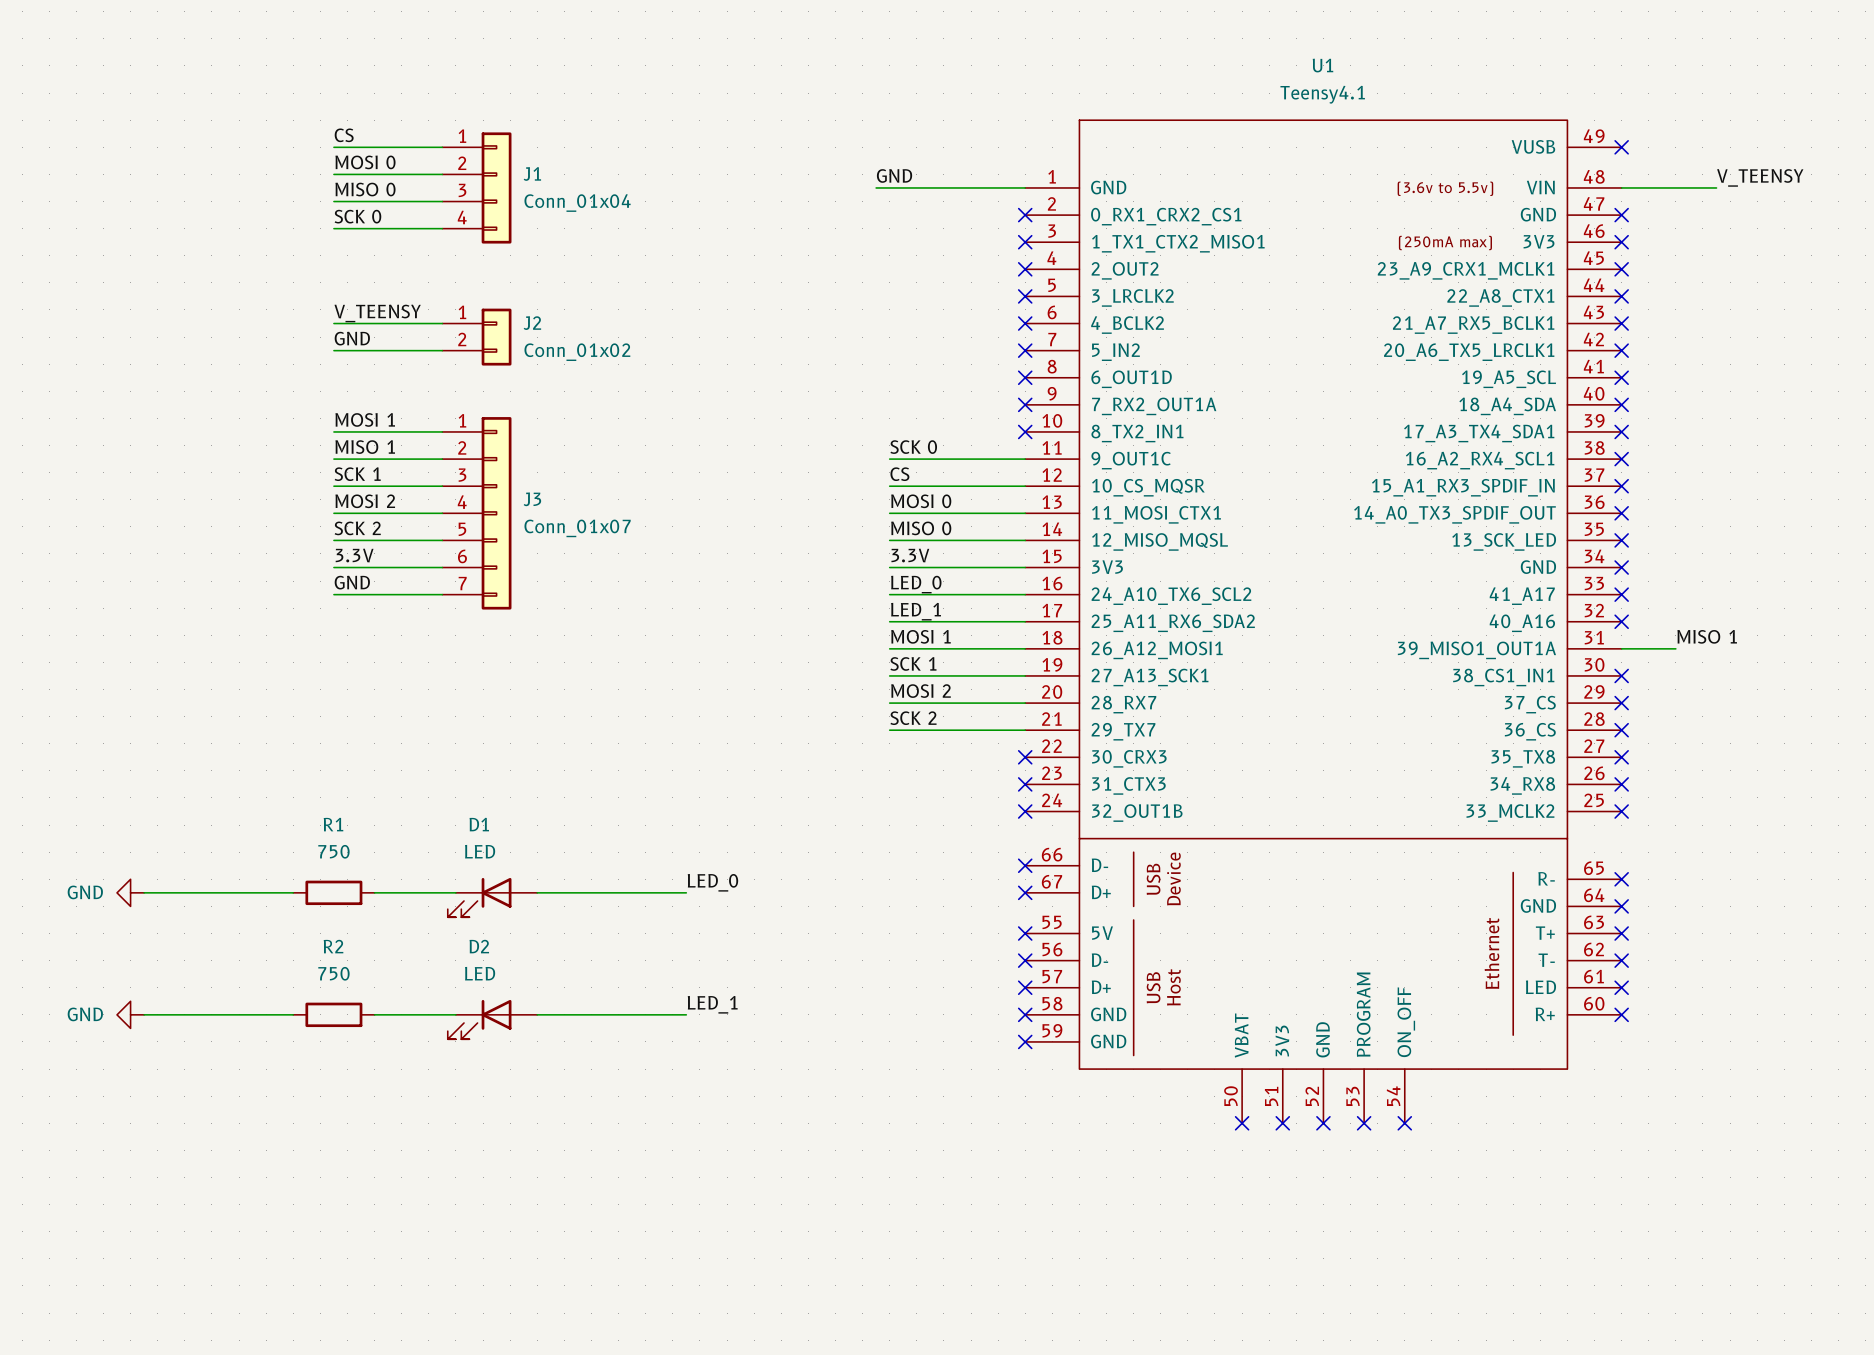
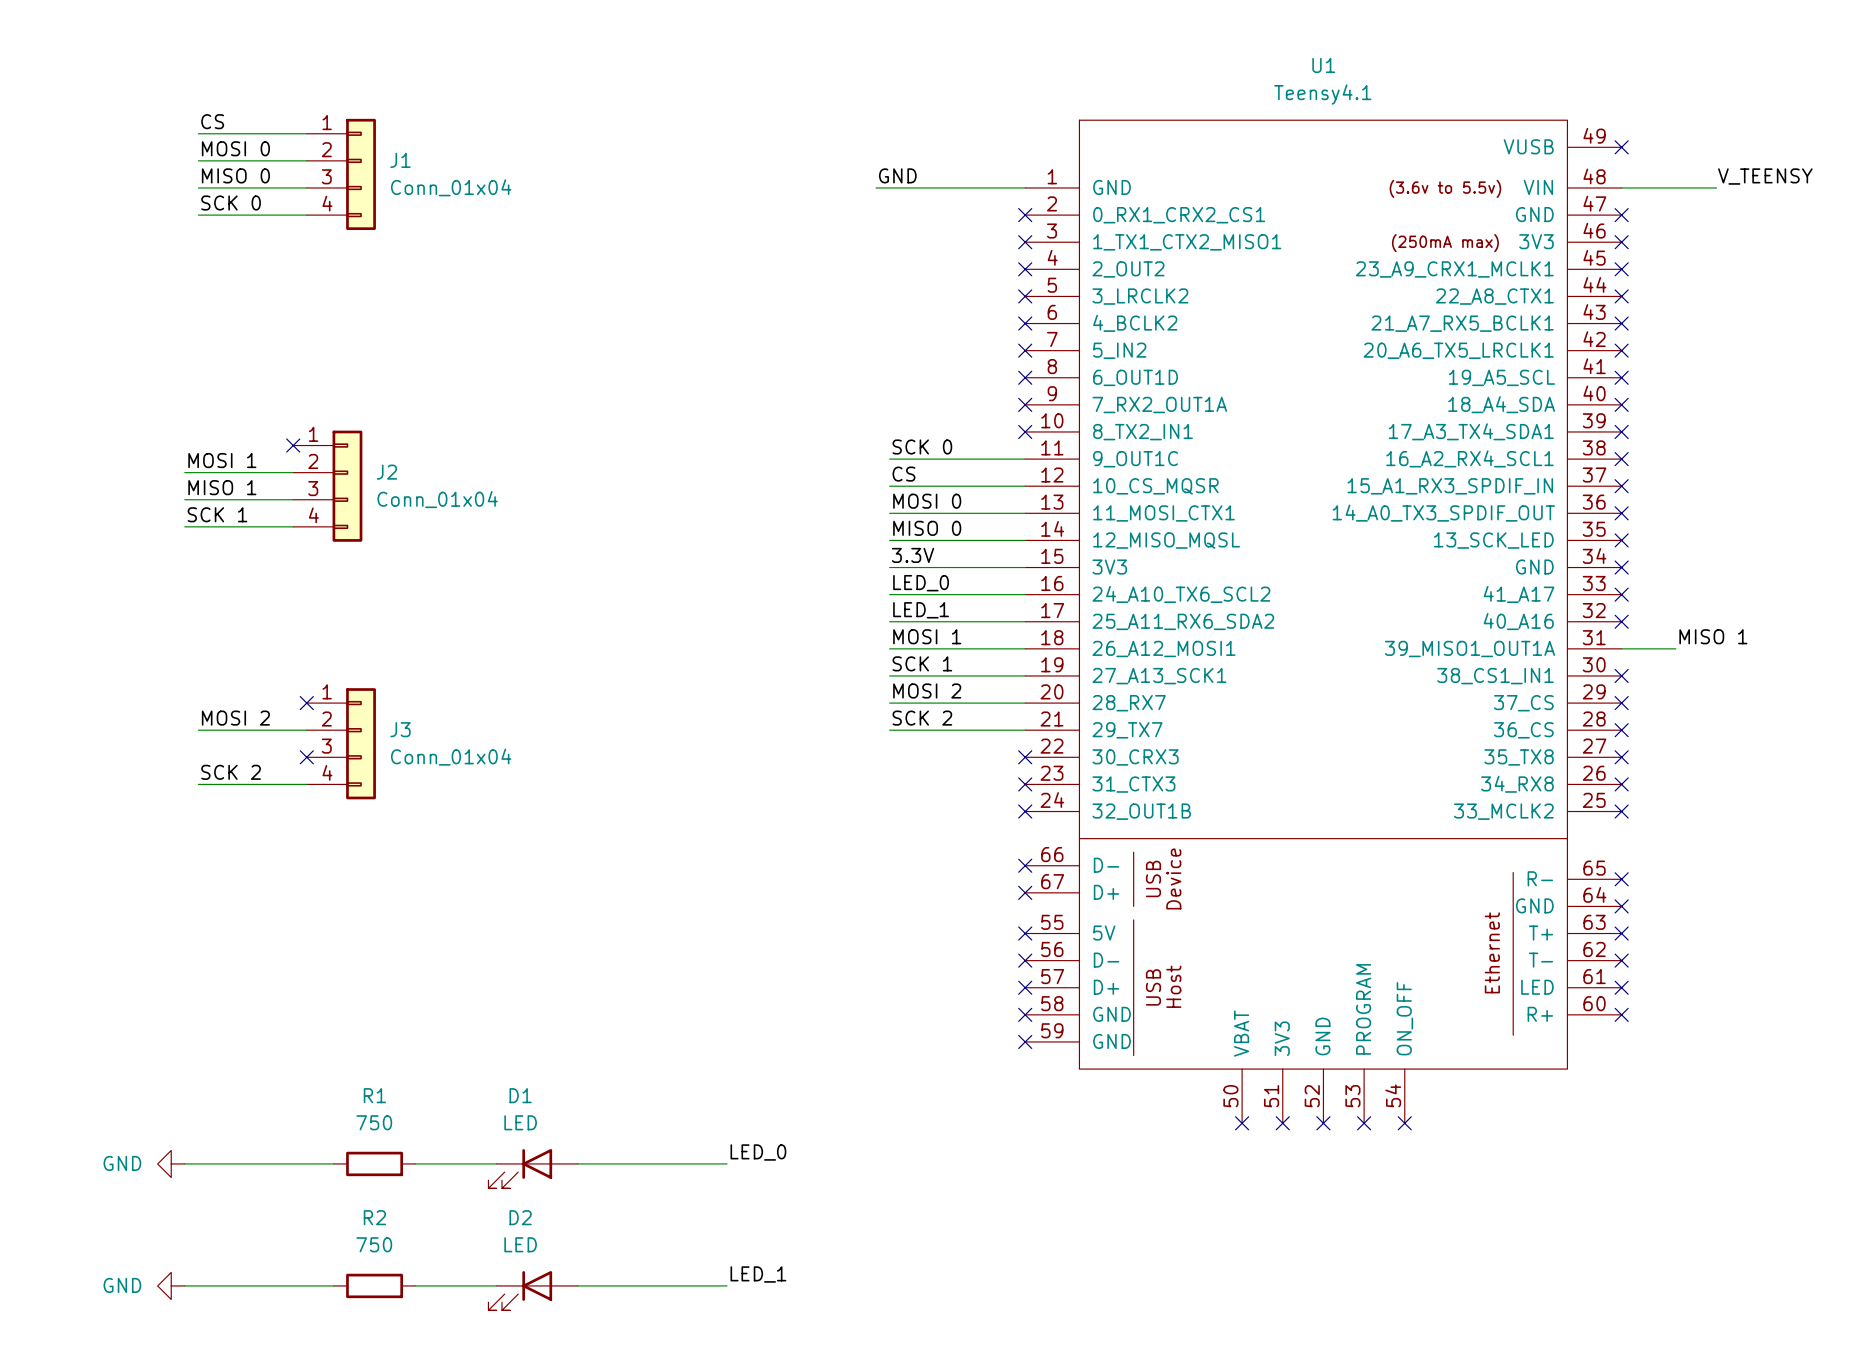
label position: CS (344, 135) -> CS (212, 121)
wire: (333, 147) (442, 147) -> (198, 133) (306, 133)
label position: MOSI 0 (365, 162) -> MOSI 0 (235, 148)
wire: (333, 174) (442, 174) -> (198, 160) (306, 160)
J1 position: (476, 187) -> (341, 174)
label position: MISO 0 (365, 189) -> MISO 0 (235, 175)
wire: (333, 201) (442, 201) -> (198, 187) (306, 187)
label position: SCK 0 (357, 216) -> SCK 0 (231, 203)
wire: (333, 228) (442, 228) -> (198, 215) (306, 215)
J2 symbol: [442, 308, 512, 366] -> [293, 430, 363, 542]
label: V_TEENSY (377, 313) -> none
wire: (333, 323) (442, 323) -> none
label: GND (352, 338) -> none
wire: (333, 350) (442, 350) -> none
J2 value: Conn_01x02 (577, 352) -> Conn_01x04 (437, 499)
J3 symbol: [442, 417, 512, 610] -> [306, 688, 376, 800]
label position: MOSI 1 (365, 419) -> MOSI 1 (222, 460)
wire: (333, 431) (442, 431) -> none
no-connect mark: none -> (293, 445)
label position: MISO 1 (365, 447) -> MISO 1 (222, 487)
wire: (333, 459) (442, 459) -> (184, 472) (293, 472)
label position: SCK 1 (357, 474) -> SCK 1 (217, 514)
wire: (333, 486) (442, 486) -> (184, 499) (293, 499)
label position: MOSI 2 (365, 501) -> MOSI 2 (235, 718)
wire: (333, 513) (442, 513) -> (184, 526) (293, 526)
label: SCK 2 (357, 528) -> none
J3 value: Conn_01x07 (577, 528) -> Conn_01x04 (451, 757)
wire: (333, 540) (442, 540) -> (198, 730) (306, 730)
label: 3.3V (354, 555) -> none
wire: (333, 567) (442, 567) -> none
label: GND (352, 582) -> none
wire: (333, 594) (442, 594) -> (198, 784) (306, 784)
no-connect mark: none -> (306, 703)
no-connect mark: none -> (306, 757)
label: none -> SCK 2 (231, 772)
label: LED_0 (712, 882) -> none
power symbol: GND (130, 892) -> none
wire: (144, 892) (293, 892) -> none
R1 position: (333, 892) -> (374, 1163)
wire: (374, 892) (455, 892) -> none
wire: (537, 892) (686, 892) -> none
D1 position: (492, 897) -> (533, 1168)
label: LED_1 (712, 1004) -> none
power symbol: GND (130, 1014) -> none
wire: (144, 1014) (293, 1014) -> (184, 1163) (333, 1163)
R2 position: (333, 1014) -> (374, 1285)
wire: (374, 1014) (455, 1014) -> (415, 1163) (496, 1163)
wire: (537, 1014) (686, 1014) -> (577, 1163) (727, 1163)
D2 position: (492, 1019) -> (533, 1290)
label: none -> LED_0 (758, 1152)
power symbol: none -> GND (171, 1163)
label: none -> LED_1 (758, 1274)
power symbol: none -> GND (171, 1285)
wire: none -> (184, 1285) (333, 1285)
wire: none -> (415, 1285) (496, 1285)
wire: none -> (577, 1285) (727, 1285)

